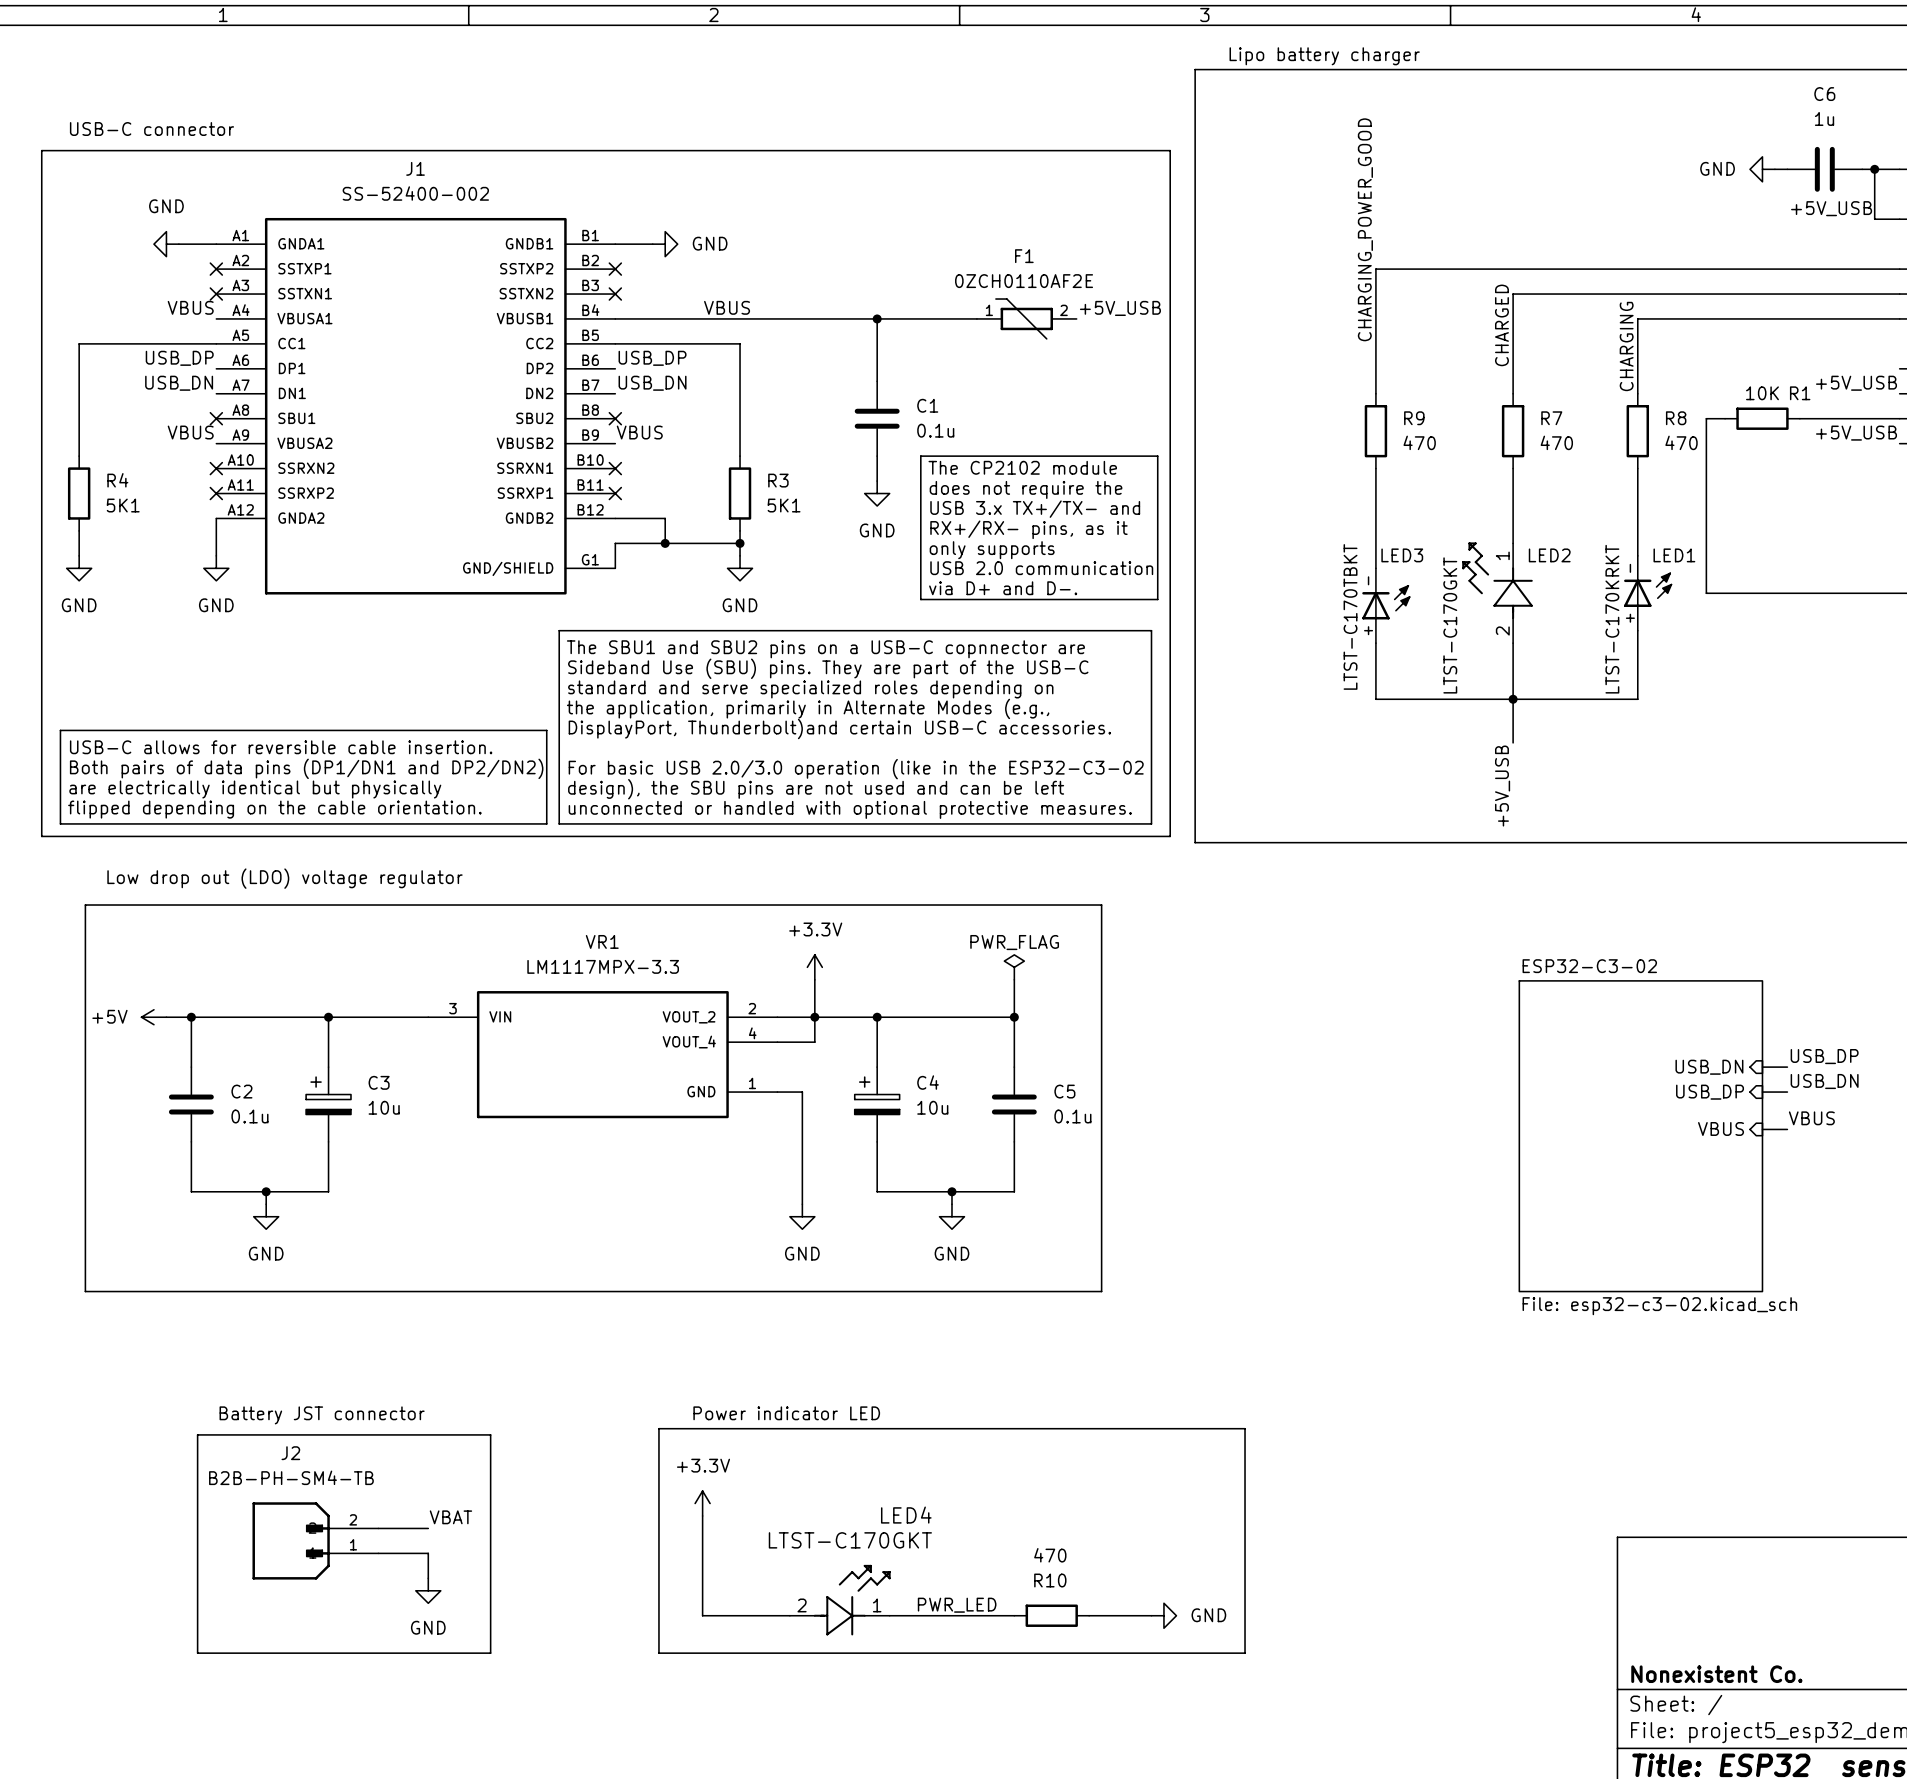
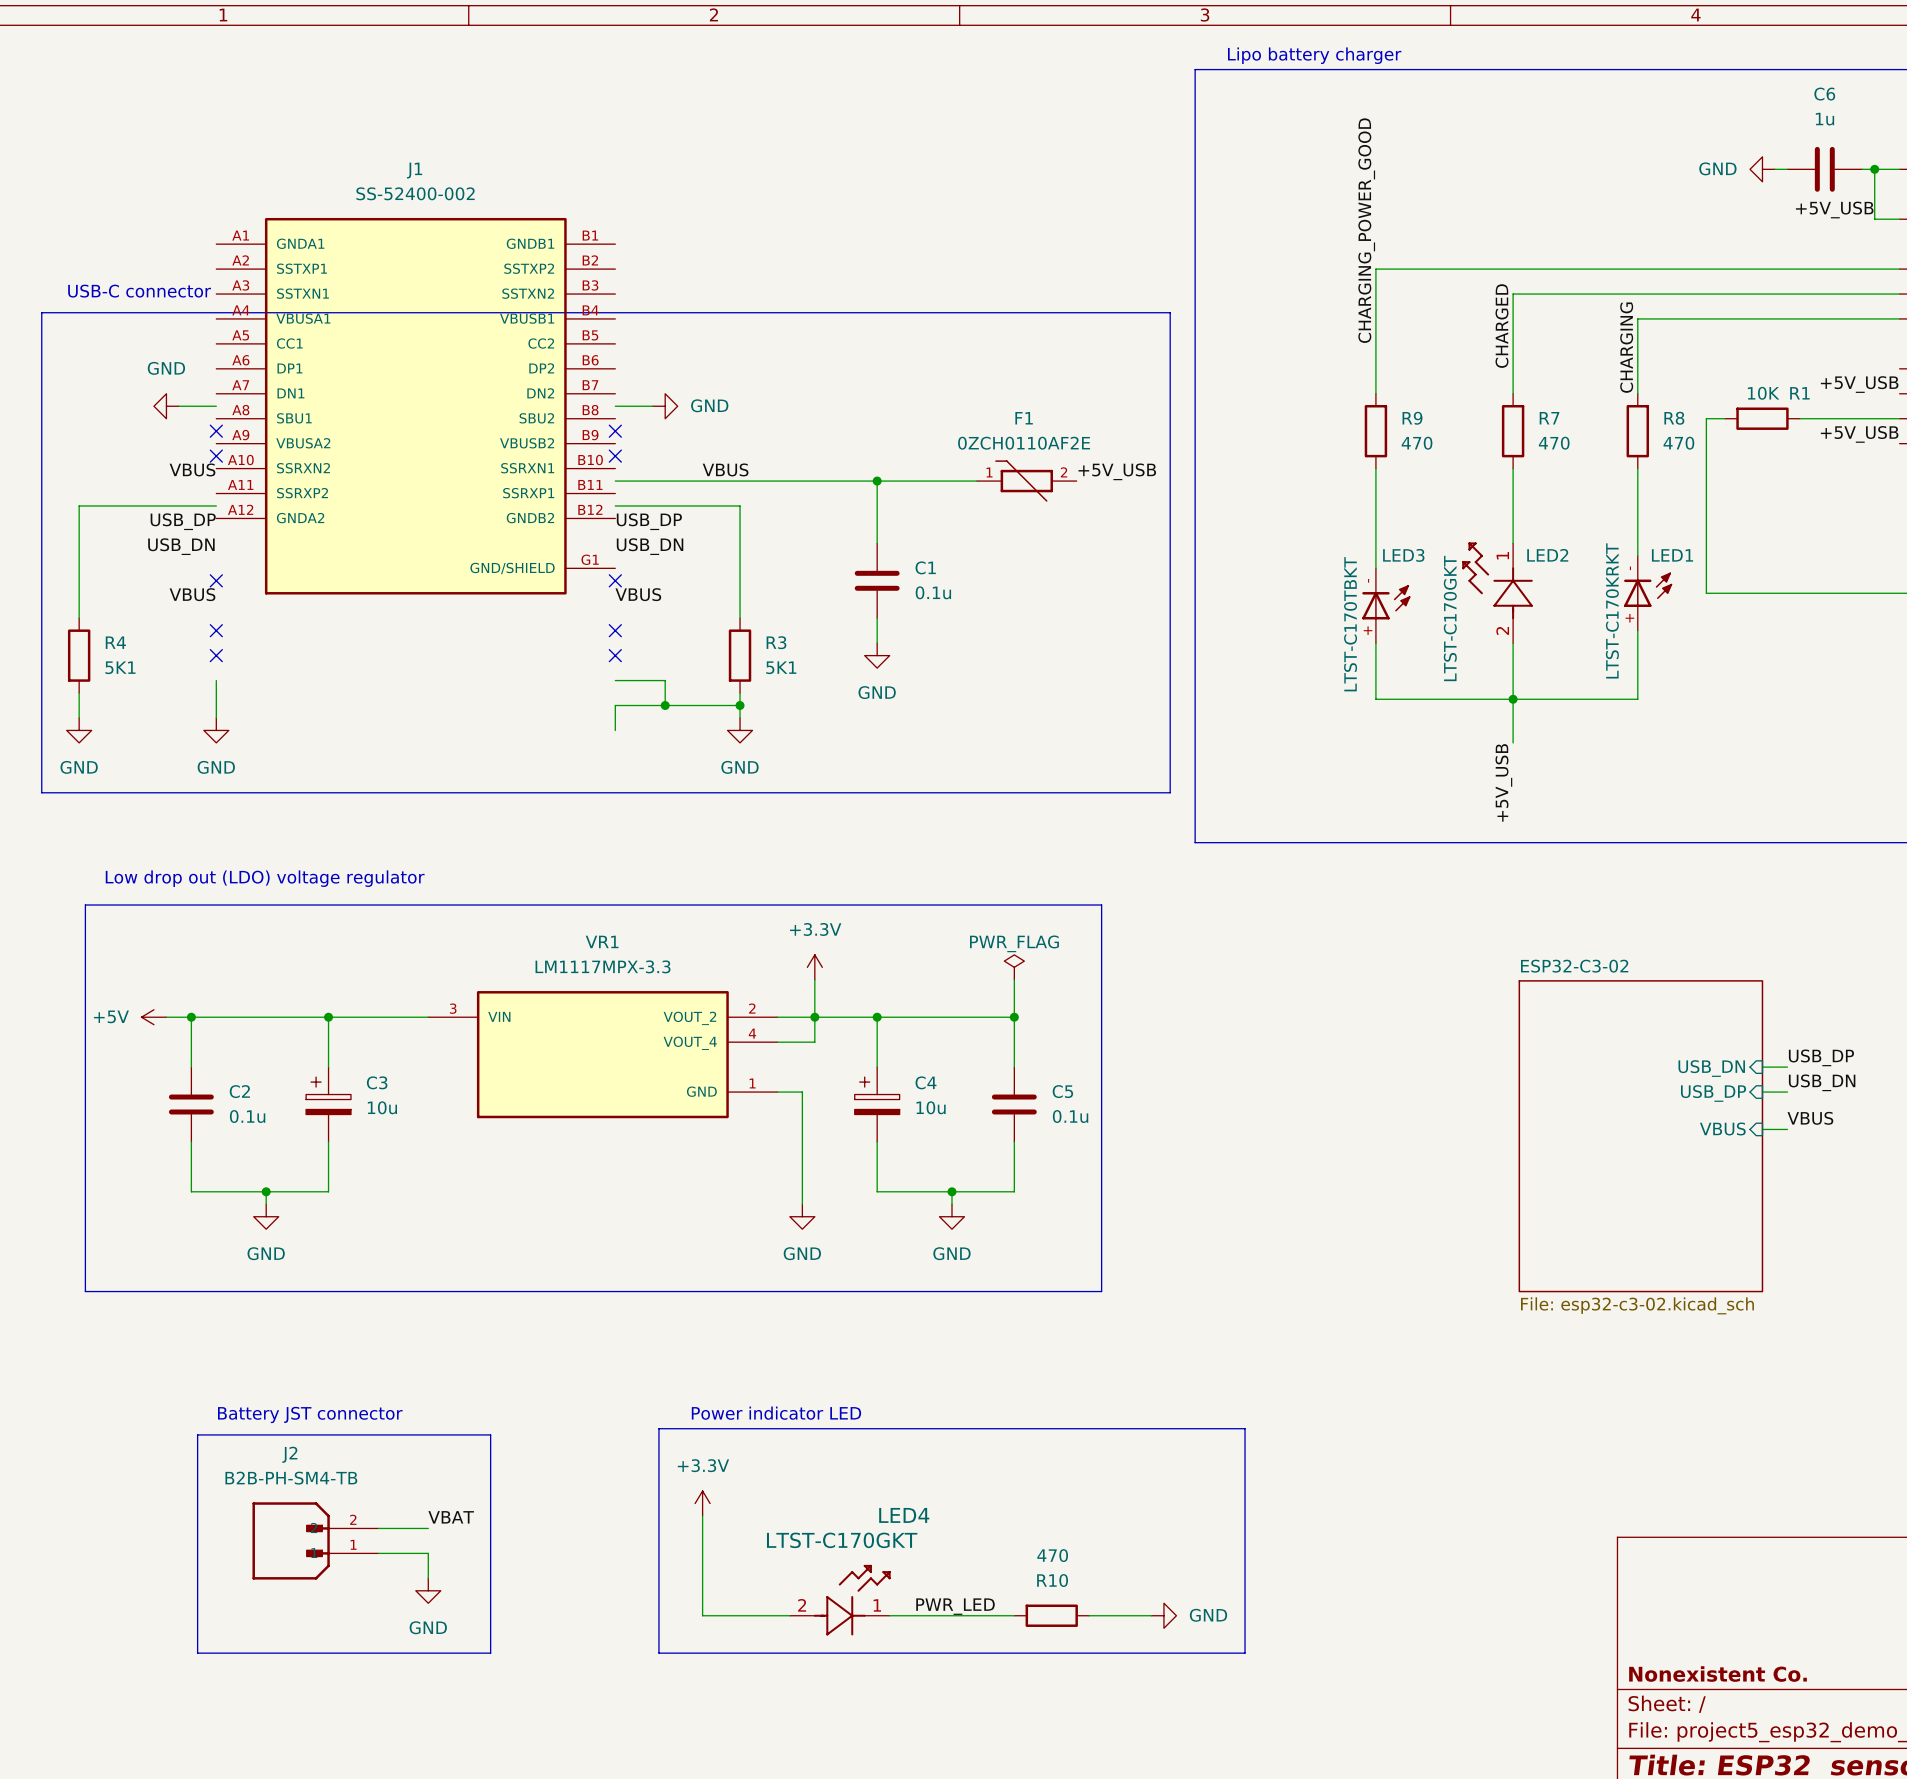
text position: USB-C connector (151, 129) -> USB-C connector (139, 291)
power symbol: GND (166, 244) -> none
wire: (178, 244) (216, 244) -> (178, 406) (216, 406)
wire: (615, 244) (652, 244) -> (615, 406) (652, 406)
power symbol: GND (665, 244) -> none
no-connect mark: (216, 269) -> none
no-connect mark: (615, 269) -> none
no-connect mark: (216, 294) -> none
no-connect mark: (615, 294) -> none
label: VBUS (190, 307) -> none
label: VBUS (727, 307) -> none
label position: +5V_USB (1120, 308) -> +5V_USB (1117, 471)
line: (41, 312) (41, 150) (1170, 150) (1170, 312) -> (41, 312) (1170, 312)
wire: (615, 318) (976, 318) -> (615, 481) (976, 481)
wire: (877, 318) (877, 381) -> none
junction: (877, 318) -> none
F1 position: (1026, 318) -> (1026, 481)
wire: (216, 343) (79, 343) (79, 456) -> none
wire: (615, 343) (740, 343) (740, 456) -> none
label position: USB_DP (179, 358) -> USB_DP (183, 521)
label position: USB_DP (652, 358) -> USB_DP (649, 521)
label position: USB_DN (179, 383) -> USB_DN (181, 546)
label position: USB_DN (652, 383) -> USB_DN (650, 546)
power symbol: none -> GND (166, 406)
power symbol: none -> GND (665, 406)
no-connect mark position: (216, 418) -> (216, 431)
no-connect mark position: (615, 418) -> (615, 431)
C1 position: (877, 418) -> (877, 580)
label position: VBUS (190, 432) -> VBUS (192, 469)
label: VBUS (639, 432) -> none
wire: (877, 456) (877, 481) -> (877, 543) (877, 481)
line: (920, 456) (1157, 456) (1157, 599) (920, 599) (920, 456) -> none
text: The CP2102 module (1022, 467) -> none
no-connect mark position: (216, 468) -> (216, 456)
no-connect mark position: (615, 468) -> (615, 456)
label: none -> VBUS (725, 469)
junction: none -> (877, 481)
text: does not require the (1026, 489) -> none
R4 position: (79, 493) -> (79, 655)
no-connect mark: (216, 493) -> none
no-connect mark: (615, 493) -> none
R3 position: (740, 493) -> (740, 655)
power symbol: GND (877, 493) -> none
wire: none -> (216, 505) (79, 505) (79, 530)
wire: none -> (615, 505) (740, 505) (740, 530)
text: USB 3.x TX+/TX- and (1035, 509) -> none
wire: (216, 518) (216, 555) -> (216, 680) (216, 717)
wire: (615, 518) (665, 518) (665, 543) -> (615, 680) (665, 680) (665, 705)
text: RX+/RX- pins, as it (1028, 529) -> none
junction: (665, 543) -> none
wire: (740, 543) (615, 543) (615, 568) -> (740, 705) (615, 705) (615, 730)
junction: (740, 543) -> none
text: only supports (992, 550) -> none
wire: none -> (79, 555) (79, 618)
wire: none -> (740, 555) (740, 618)
power symbol: GND (79, 568) -> none
power symbol: GND (216, 568) -> none
power symbol: GND (740, 568) -> none
text: USB 2.0 communication (1041, 568) -> none
no-connect mark: none -> (216, 580)
no-connect mark: none -> (615, 580)
text: via D+ and D-. (1003, 588) -> none
label: none -> VBUS (192, 594)
label: none -> VBUS (638, 594)
wire: none -> (877, 618) (877, 643)
no-connect mark: none -> (216, 630)
line: (559, 630) (1151, 630) (1151, 823) (559, 823) (559, 630) -> none
no-connect mark: none -> (615, 630)
text: The SBU1 and SBU2 pins on a USB-C copnnector are (825, 649) -> none
no-connect mark: none -> (216, 655)
no-connect mark: none -> (615, 655)
power symbol: none -> GND (877, 655)
text: Sideband Use (SBU) pins. They are part of the USB-C (828, 668) -> none
text: standard and serve specialized roles depending on (810, 689) -> none
wire: none -> (79, 693) (79, 717)
wire: none -> (740, 693) (740, 717)
junction: none -> (665, 705)
junction: none -> (740, 705)
text: the application, primarily in Alternate Modes (e.g., (808, 708) -> none
text: DisplayPort, Thunderbolt)and certain USB-C accessories. (839, 729) -> none
line: (60, 730) (546, 730) (546, 823) (60, 823) (60, 730) -> none
power symbol: none -> GND (79, 730)
power symbol: none -> GND (216, 730)
power symbol: none -> GND (740, 730)
text: USB-C allows for reversible cable insertion. (281, 747) -> none
text: Both pairs of data pins (DP1/DN1 and DP2/DN2) (306, 768) -> none
text: For basic USB 2.0/3.0 operation (like in the ESP32-C3-02 (856, 769) -> none
text: are electrically identical but physically (255, 789) -> none
text: design), the SBU pins are not used and can be left (816, 789) -> none
line: (41, 792) (41, 836) (1170, 836) (1170, 792) -> (41, 792) (1170, 792)
text: flipped depending on the cable orientation. (274, 809) -> none
text: unconnected or handled with optional protective measures. (850, 809) -> none

